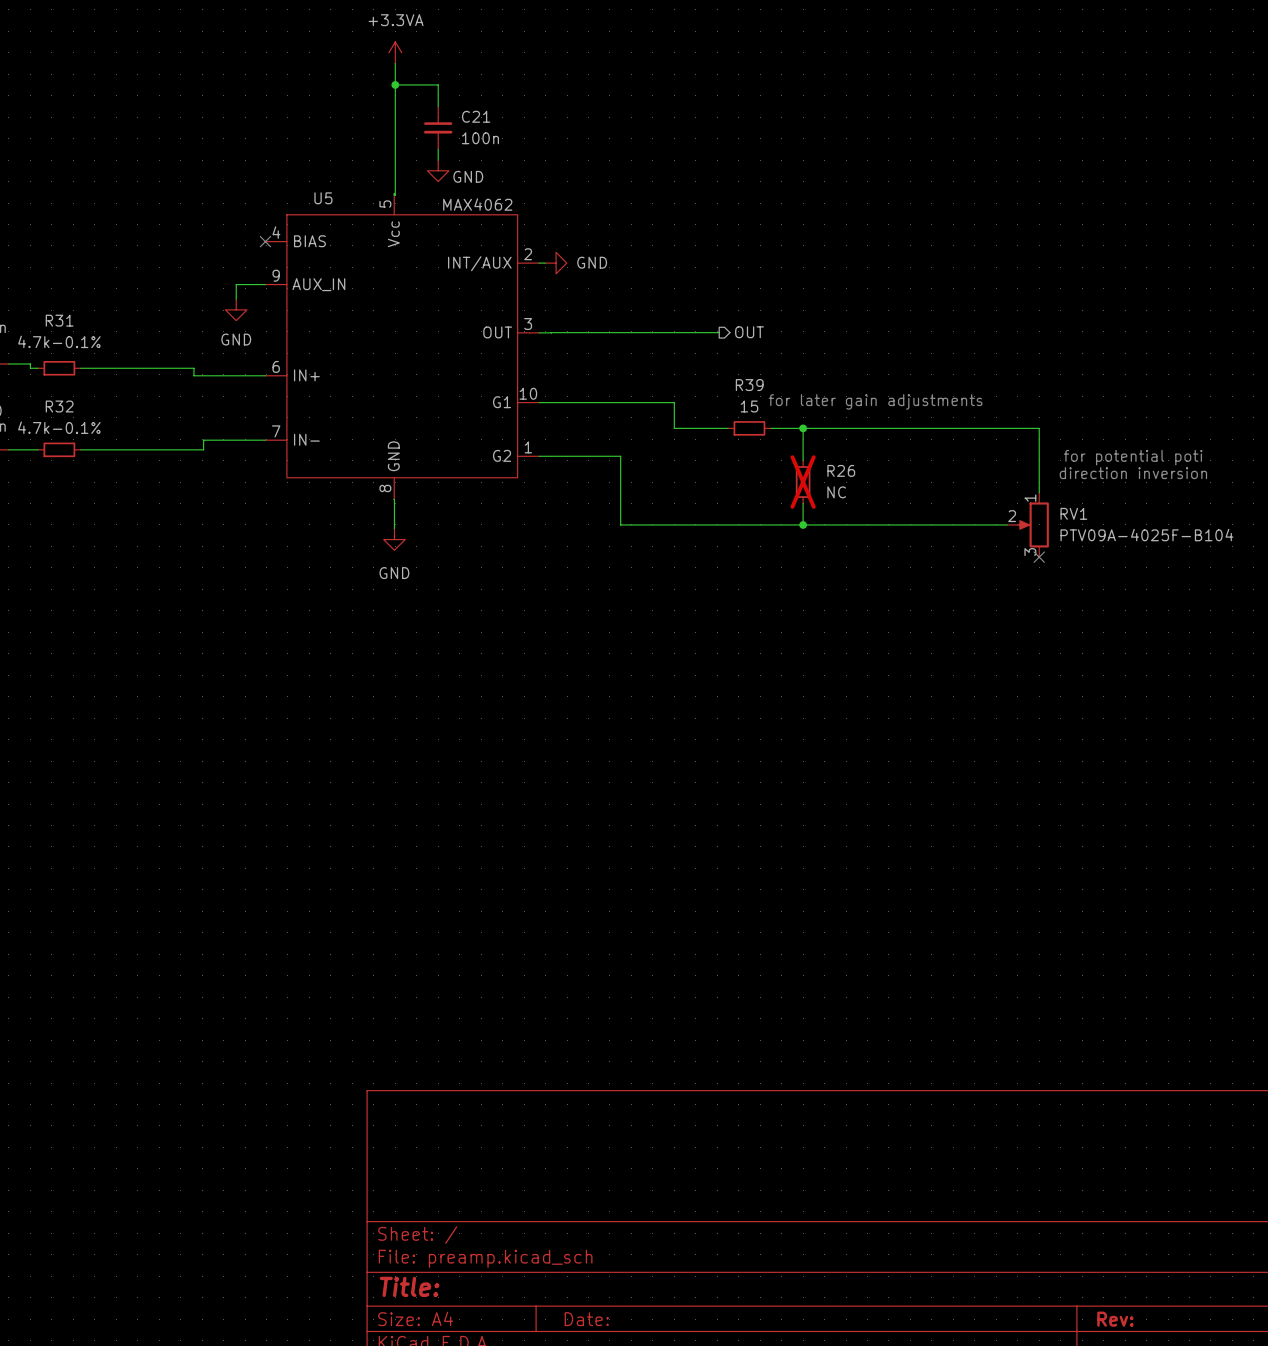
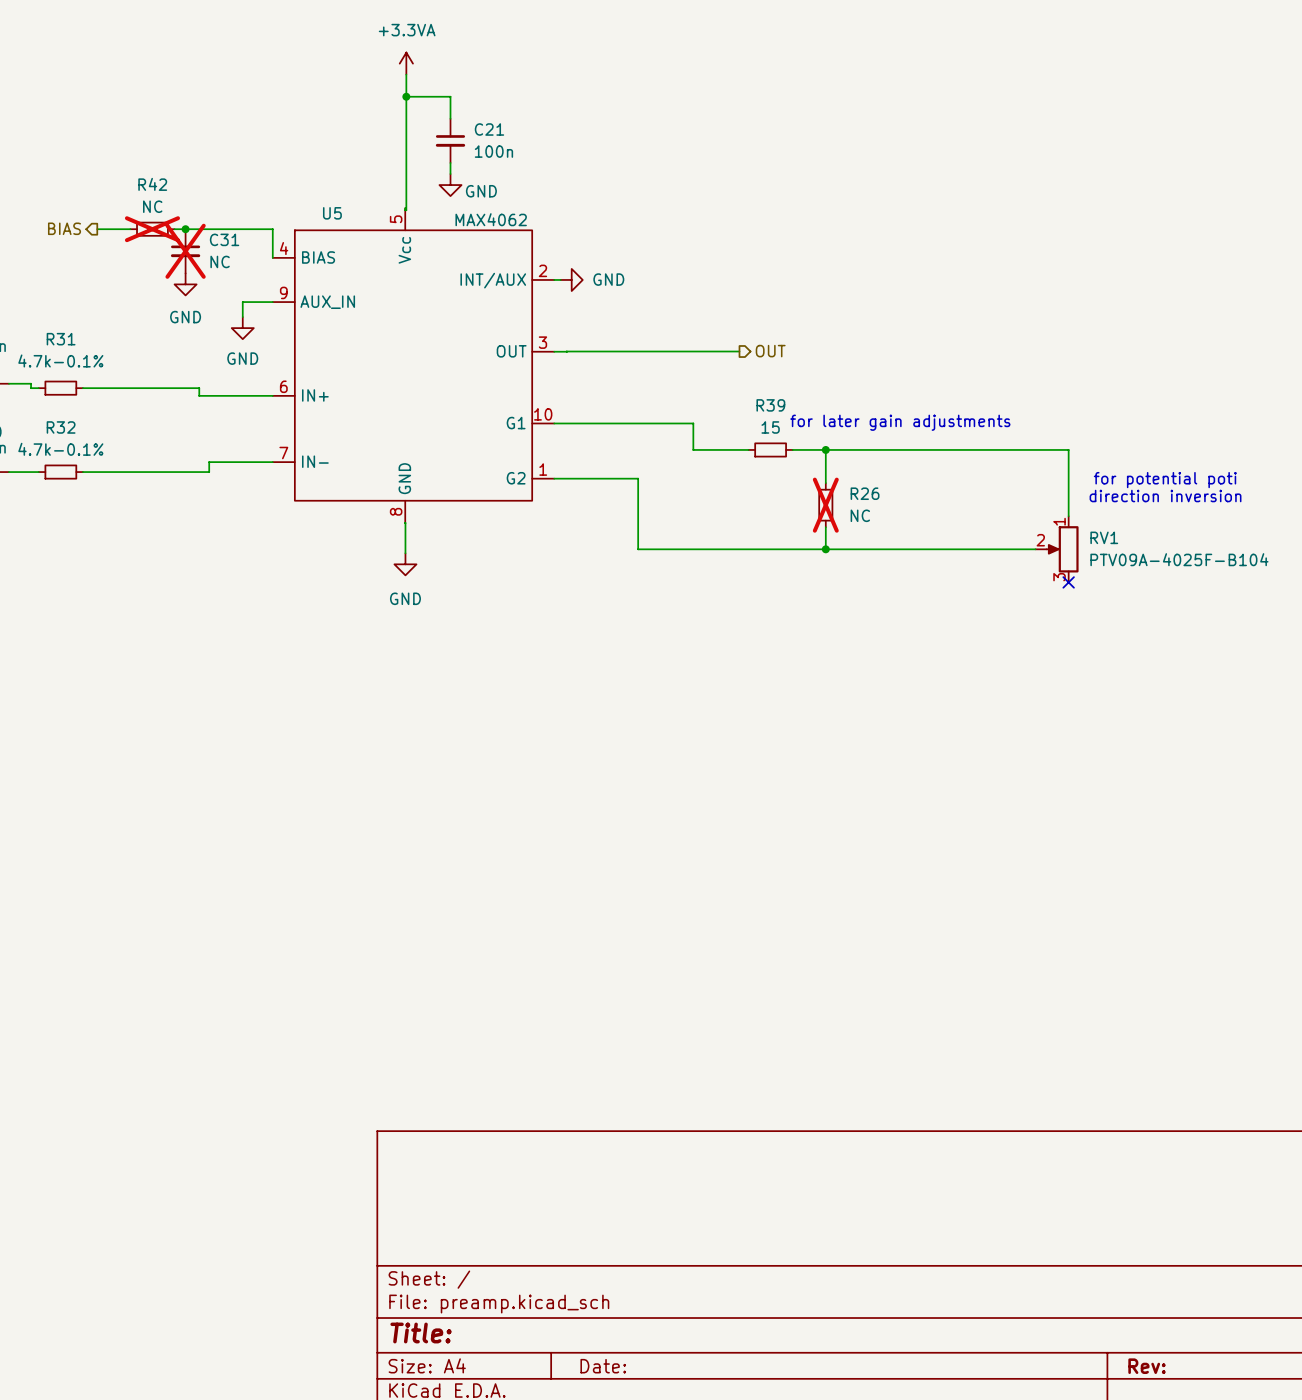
hierarchical label: none -> BIAS (64, 228)
wire: none -> (97, 229) (130, 229)
R42: none -> NC (152, 229)
wire: none -> (174, 229) (272, 229) (272, 257)
junction: none -> (185, 229)
C31: none -> NC (185, 251)
no-connect mark: (265, 241) -> none
power symbol: none -> GND (185, 284)

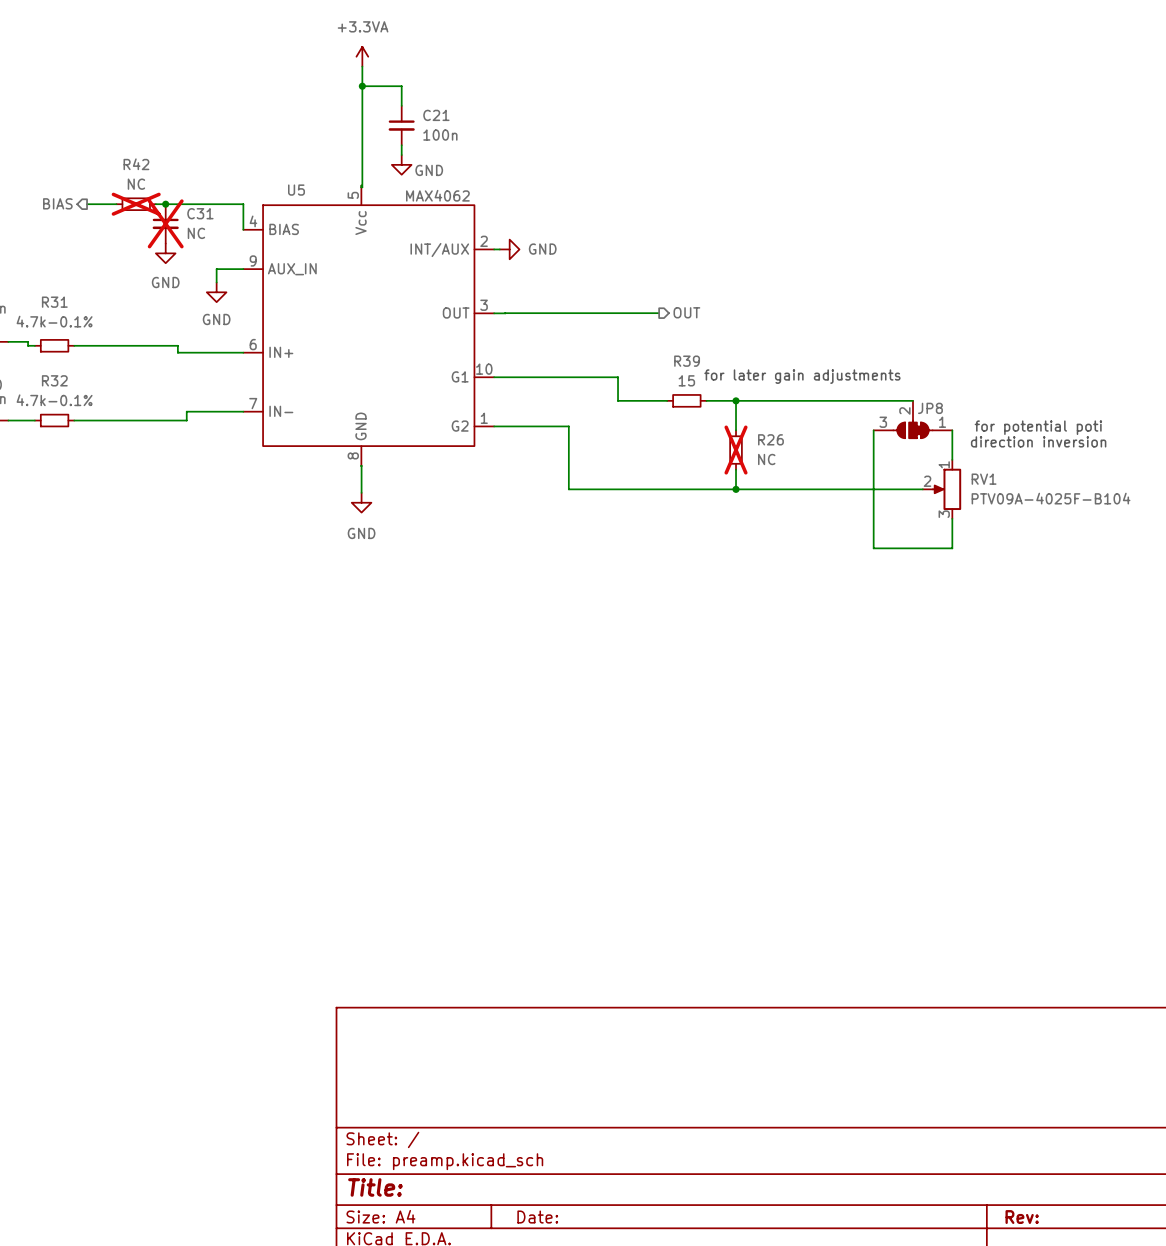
wire: (1024, 449) (1068, 449) (1068, 483) -> none
JP8: none -> (913, 419)
wire: none -> (873, 430) (873, 548) (952, 548) (952, 518)
no-connect mark: (1068, 582) -> none

